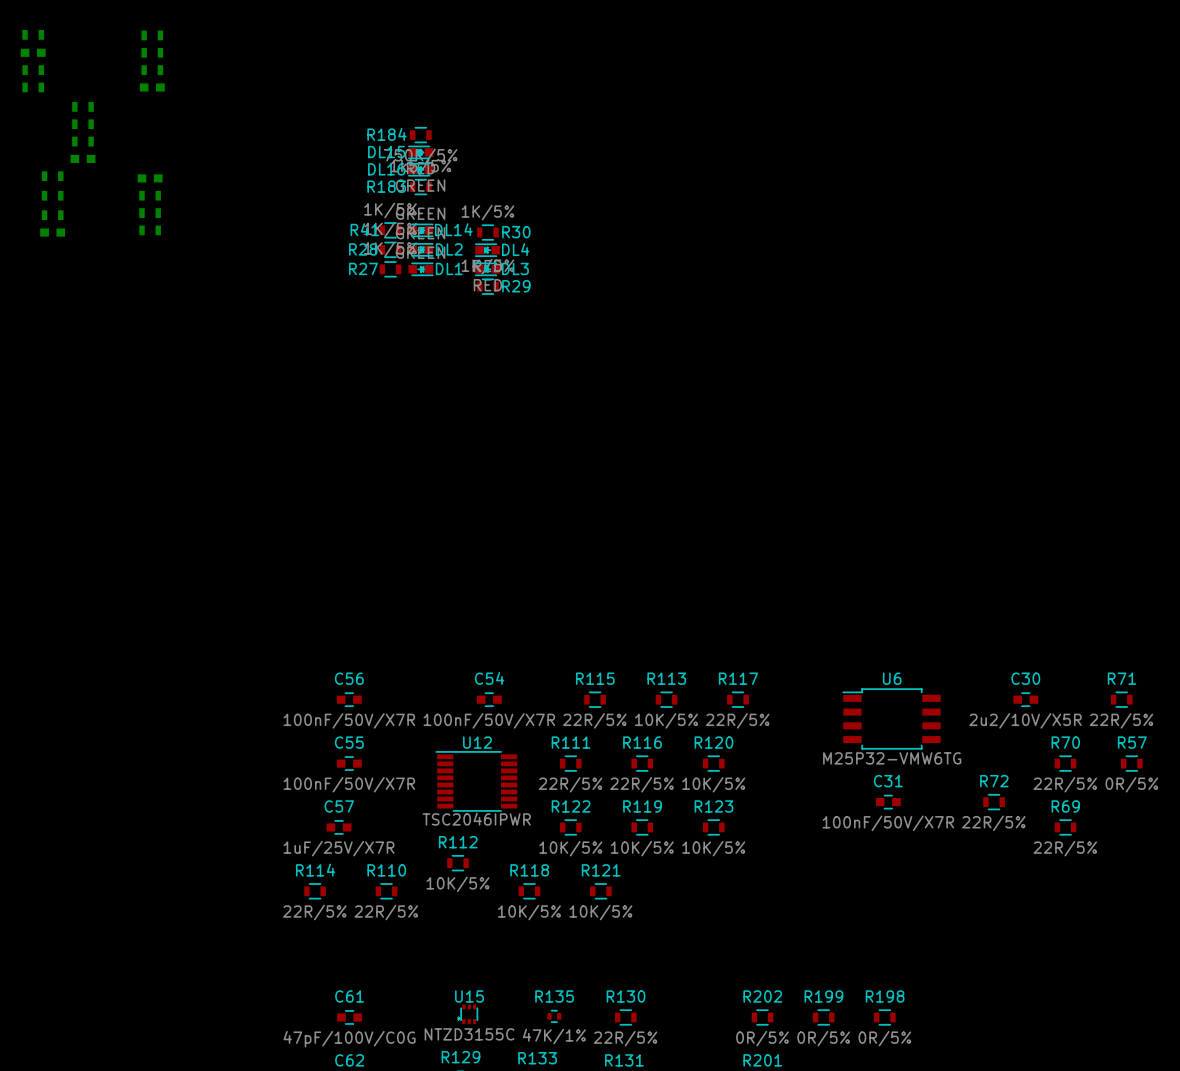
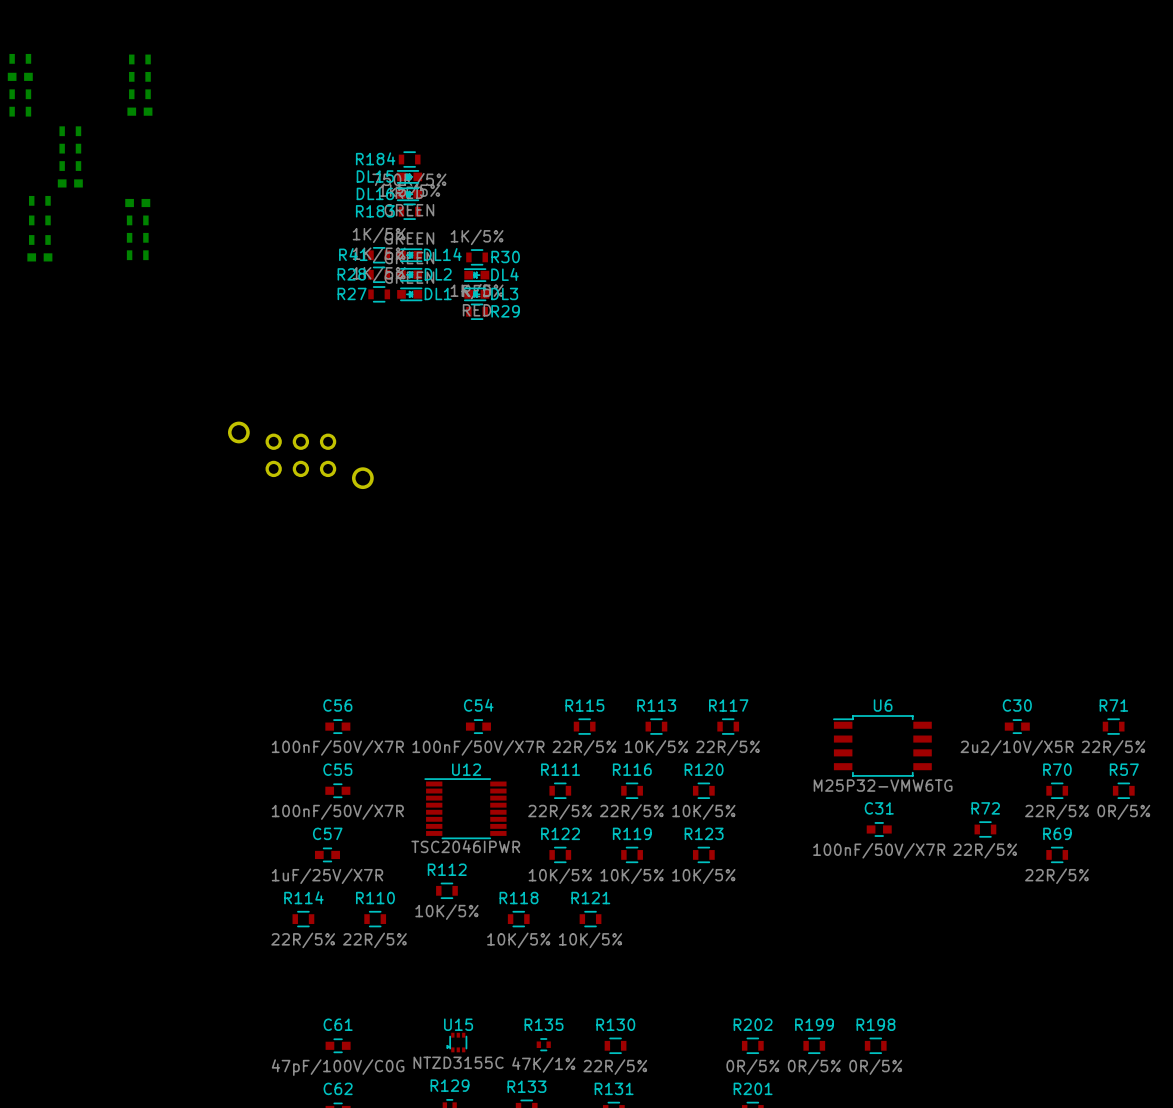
part: none -> (300, 455)

